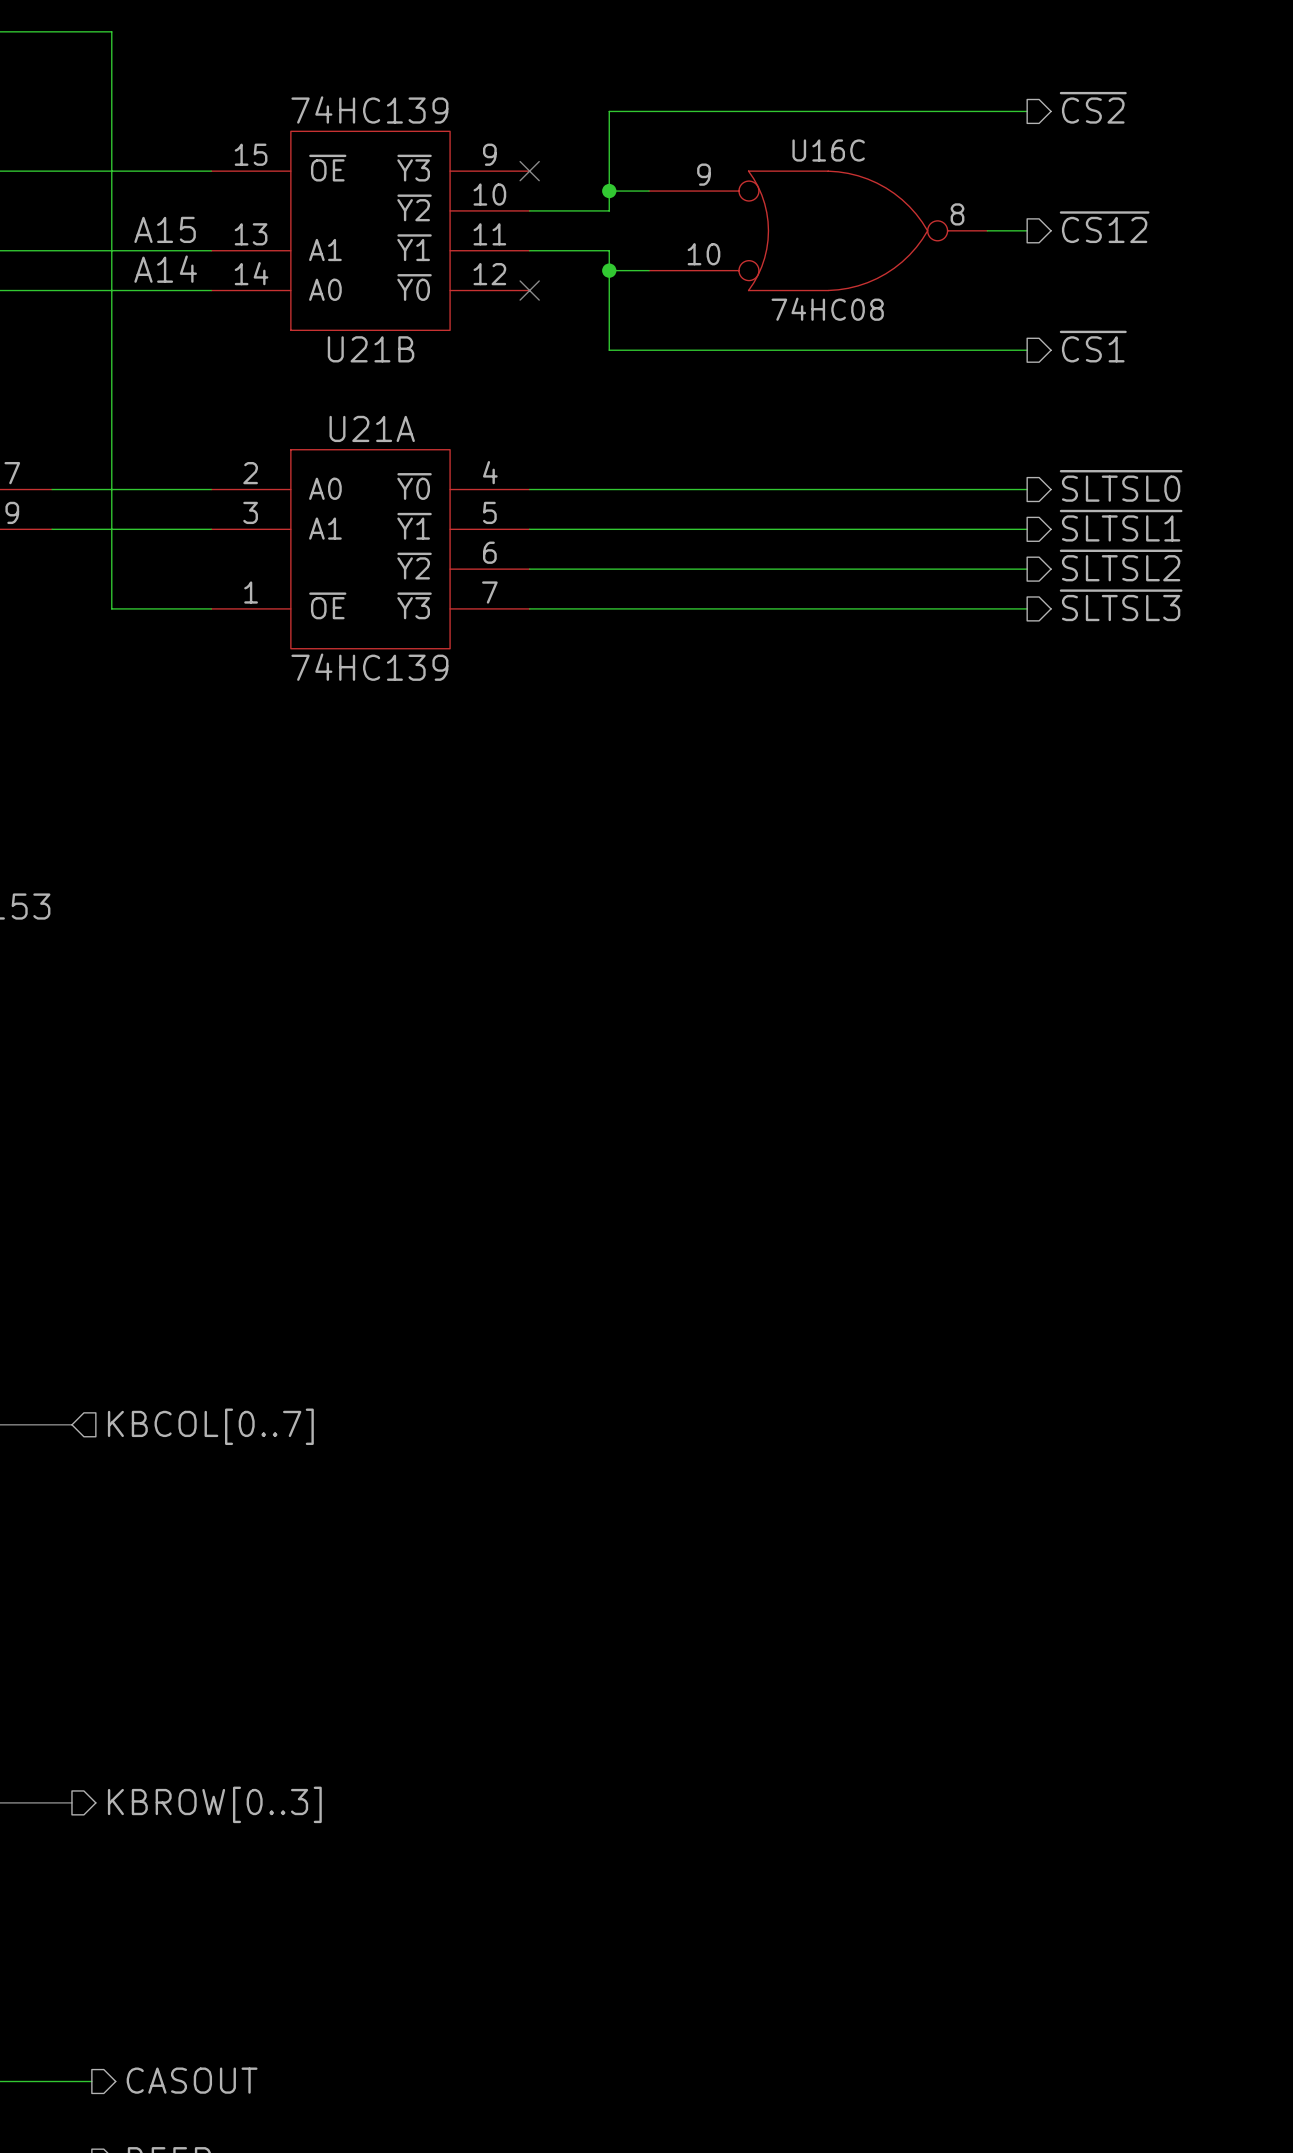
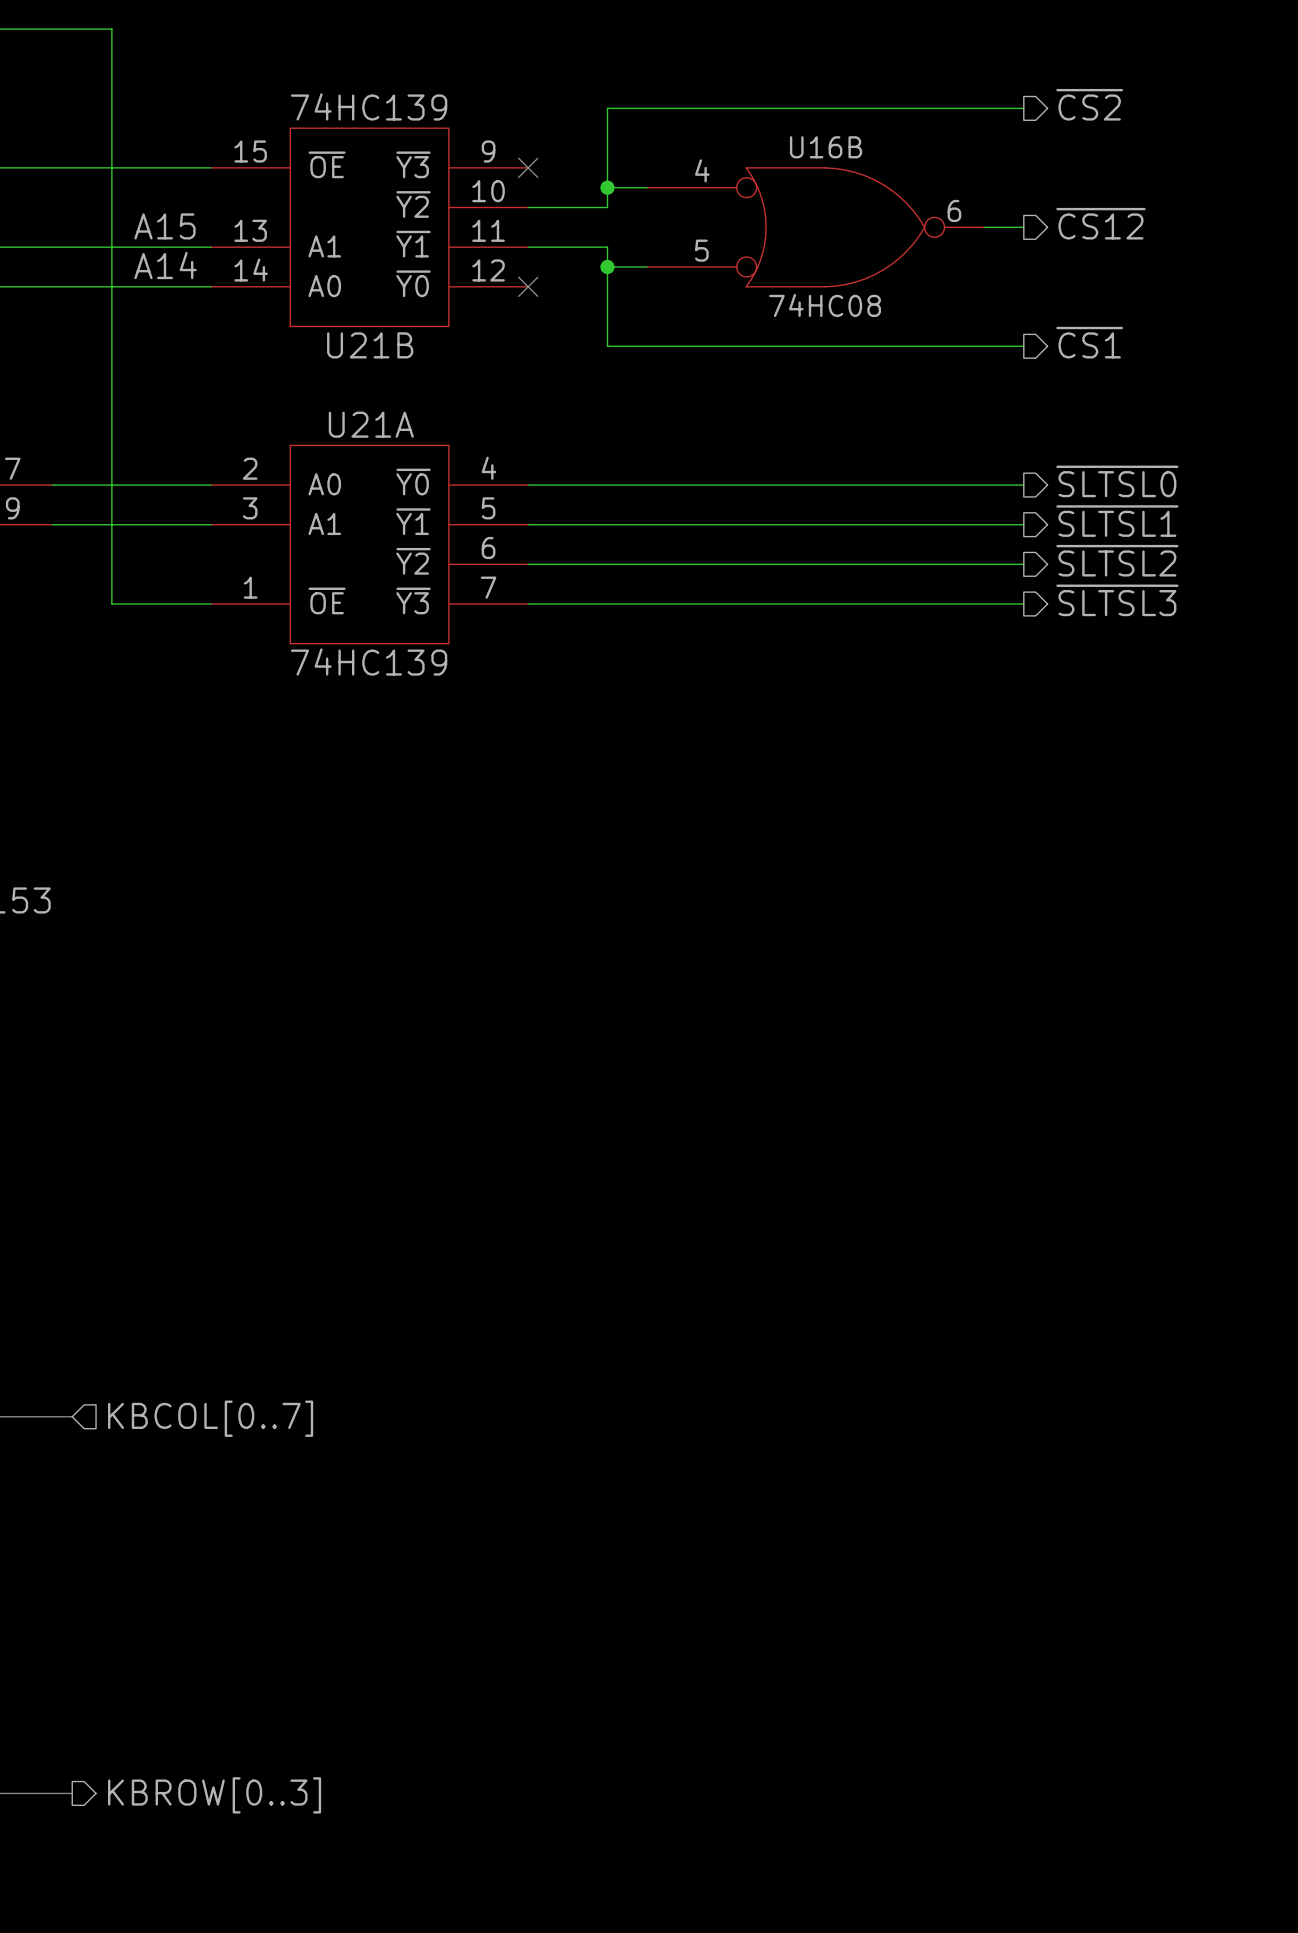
U16C name: U16C (828, 150) -> U16B (826, 147)
U16C pin number: 9 (703, 174) -> 4 (702, 170)
U16C pin number: 8 (957, 214) -> 6 (954, 210)
U16C pin number: 10 (703, 254) -> 5 (701, 250)

